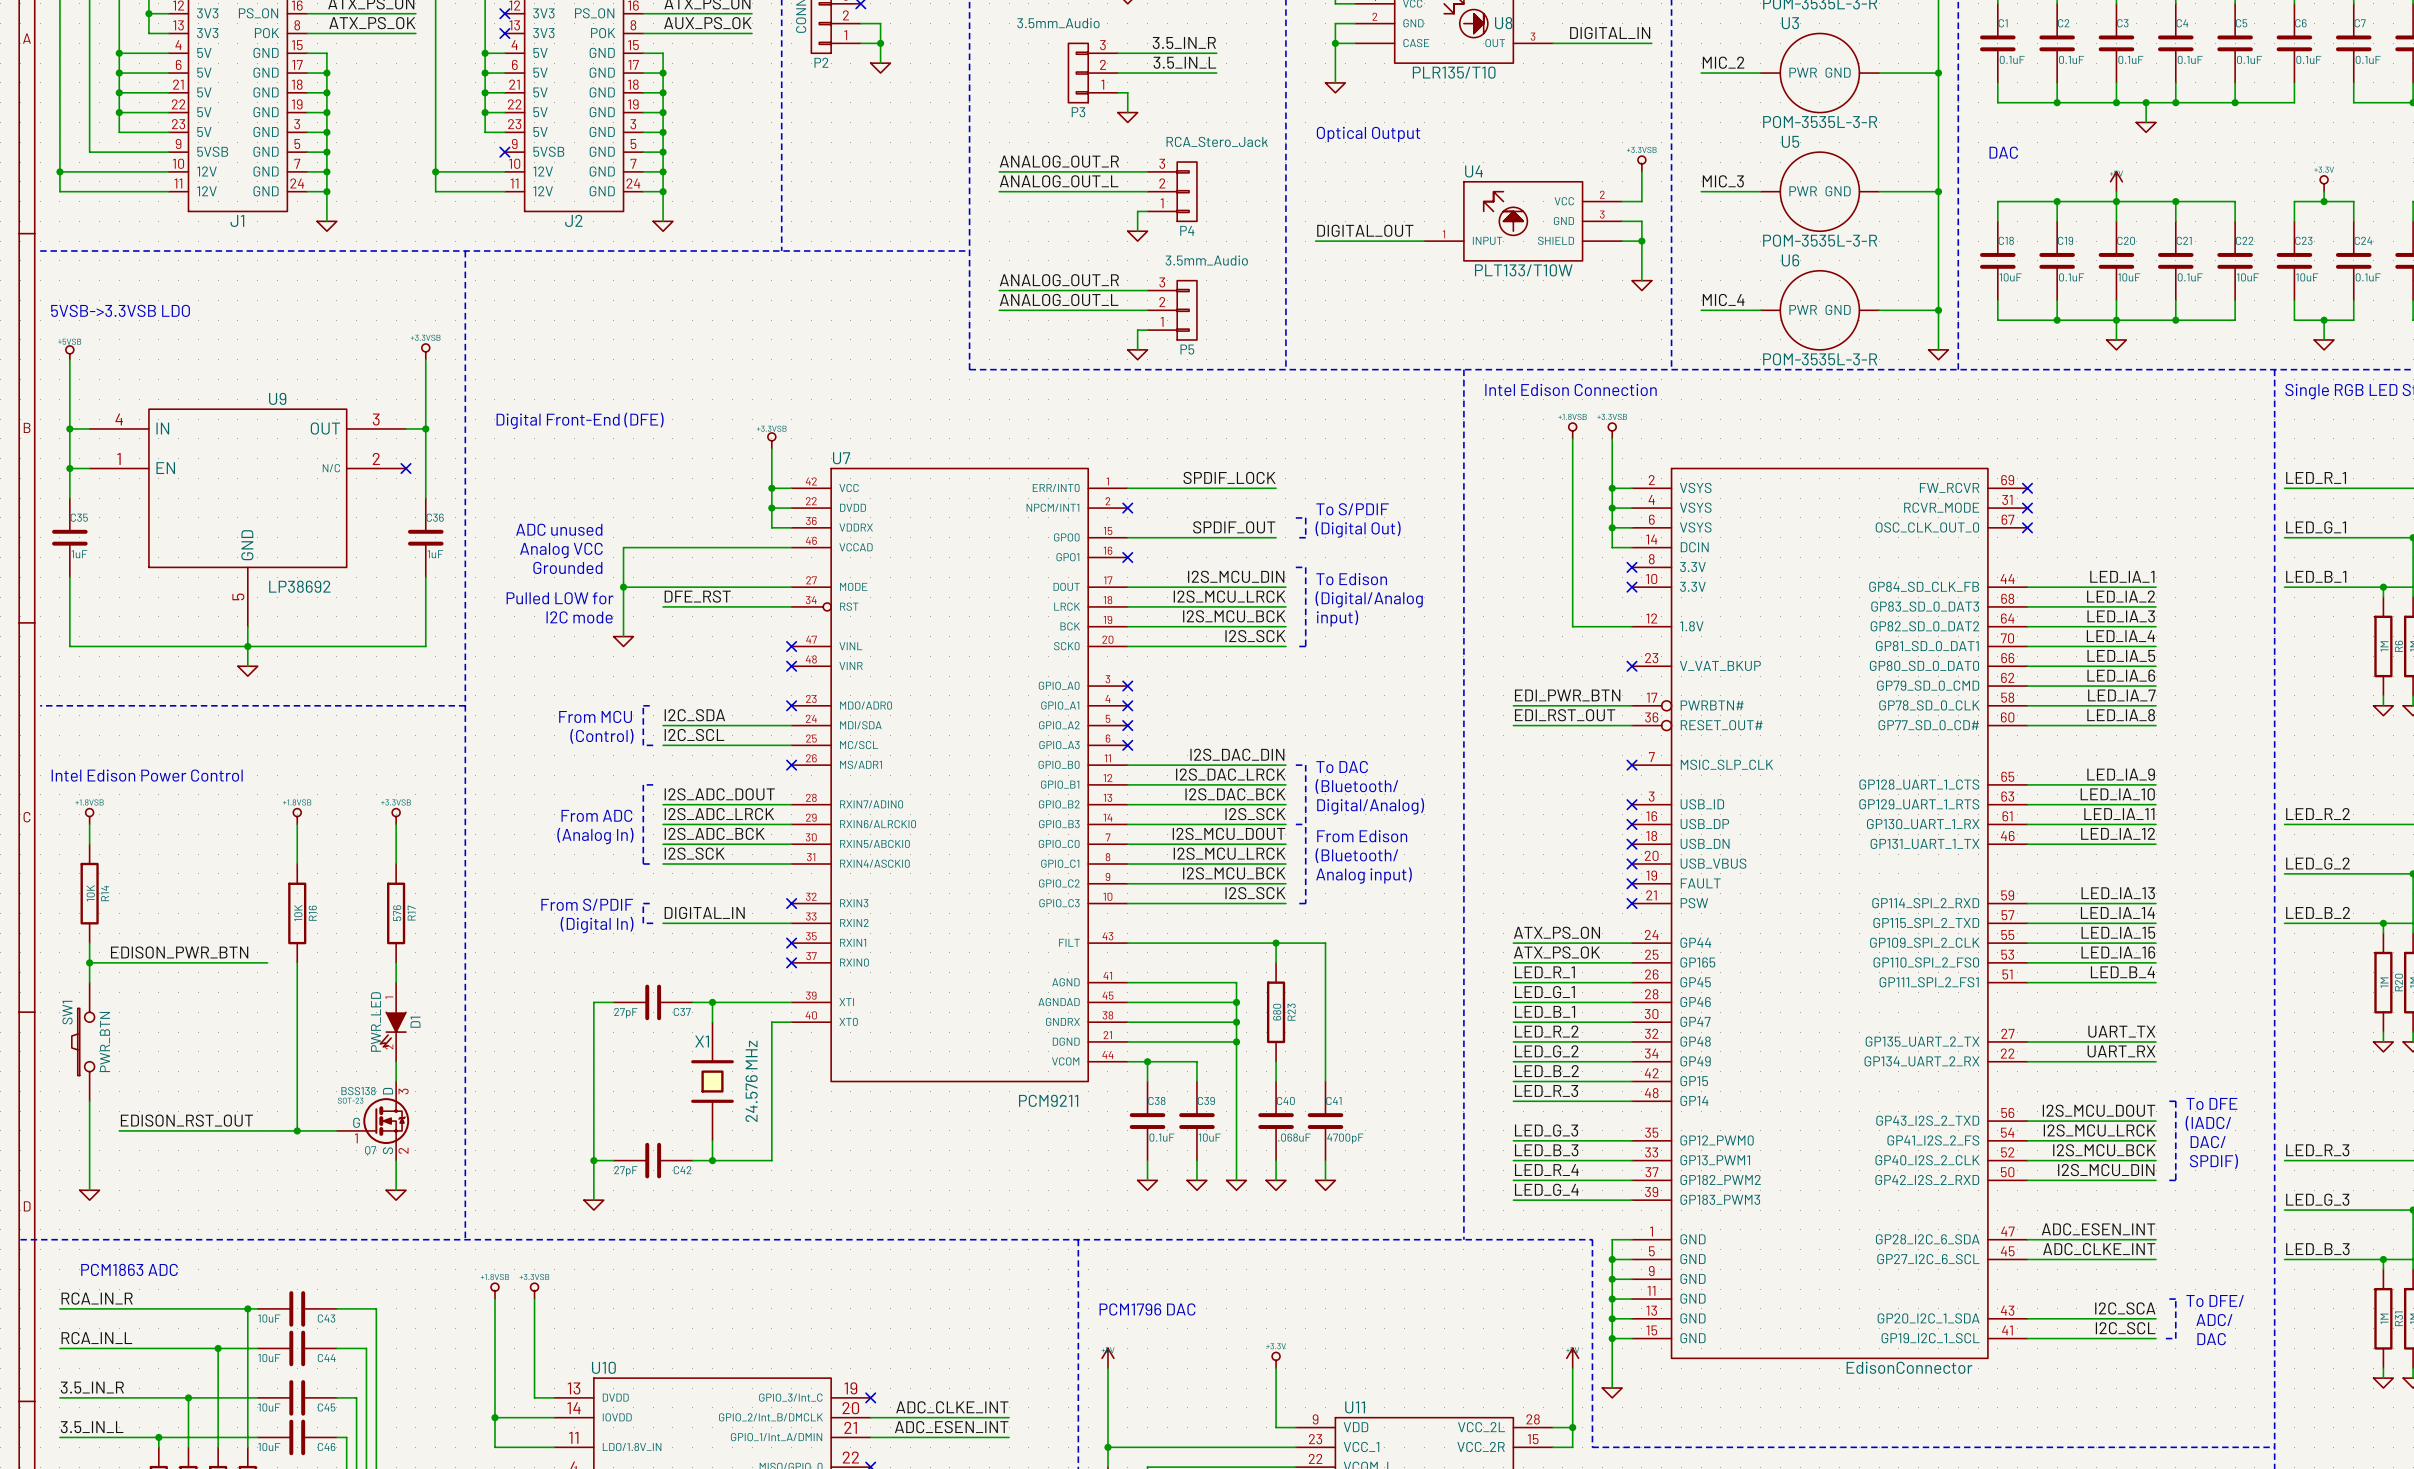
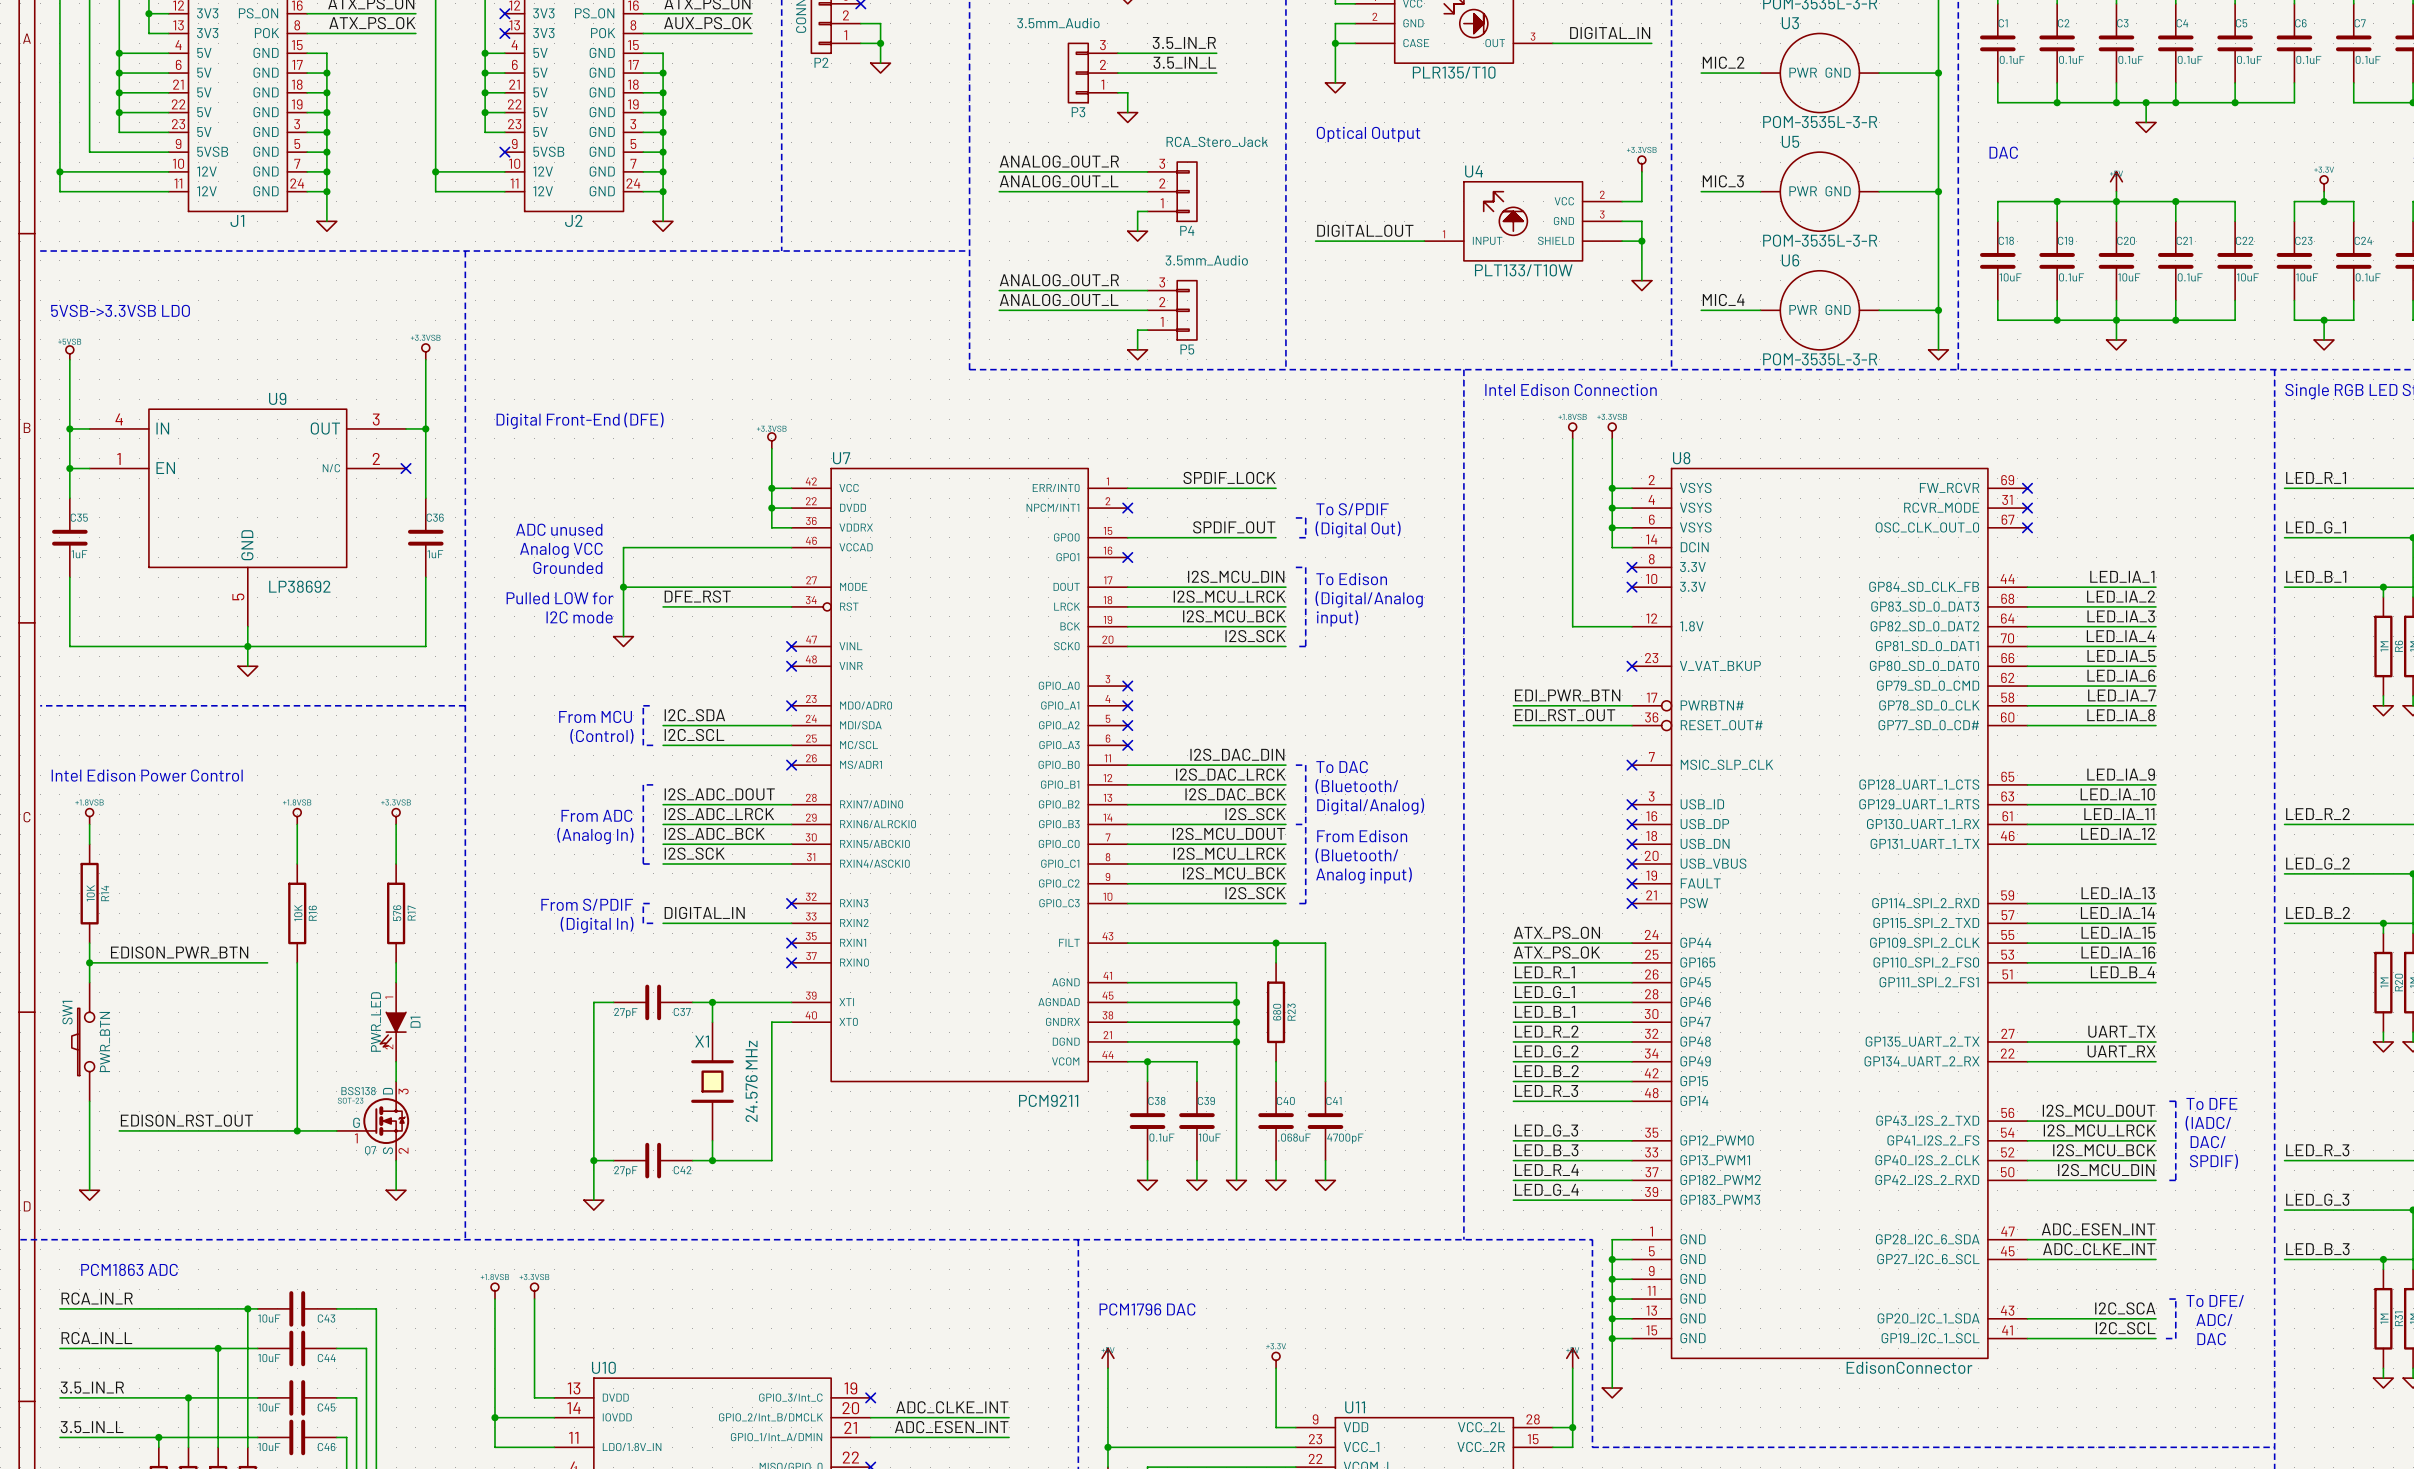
U8 name position: U8 (1503, 23) -> U8 (1681, 458)

